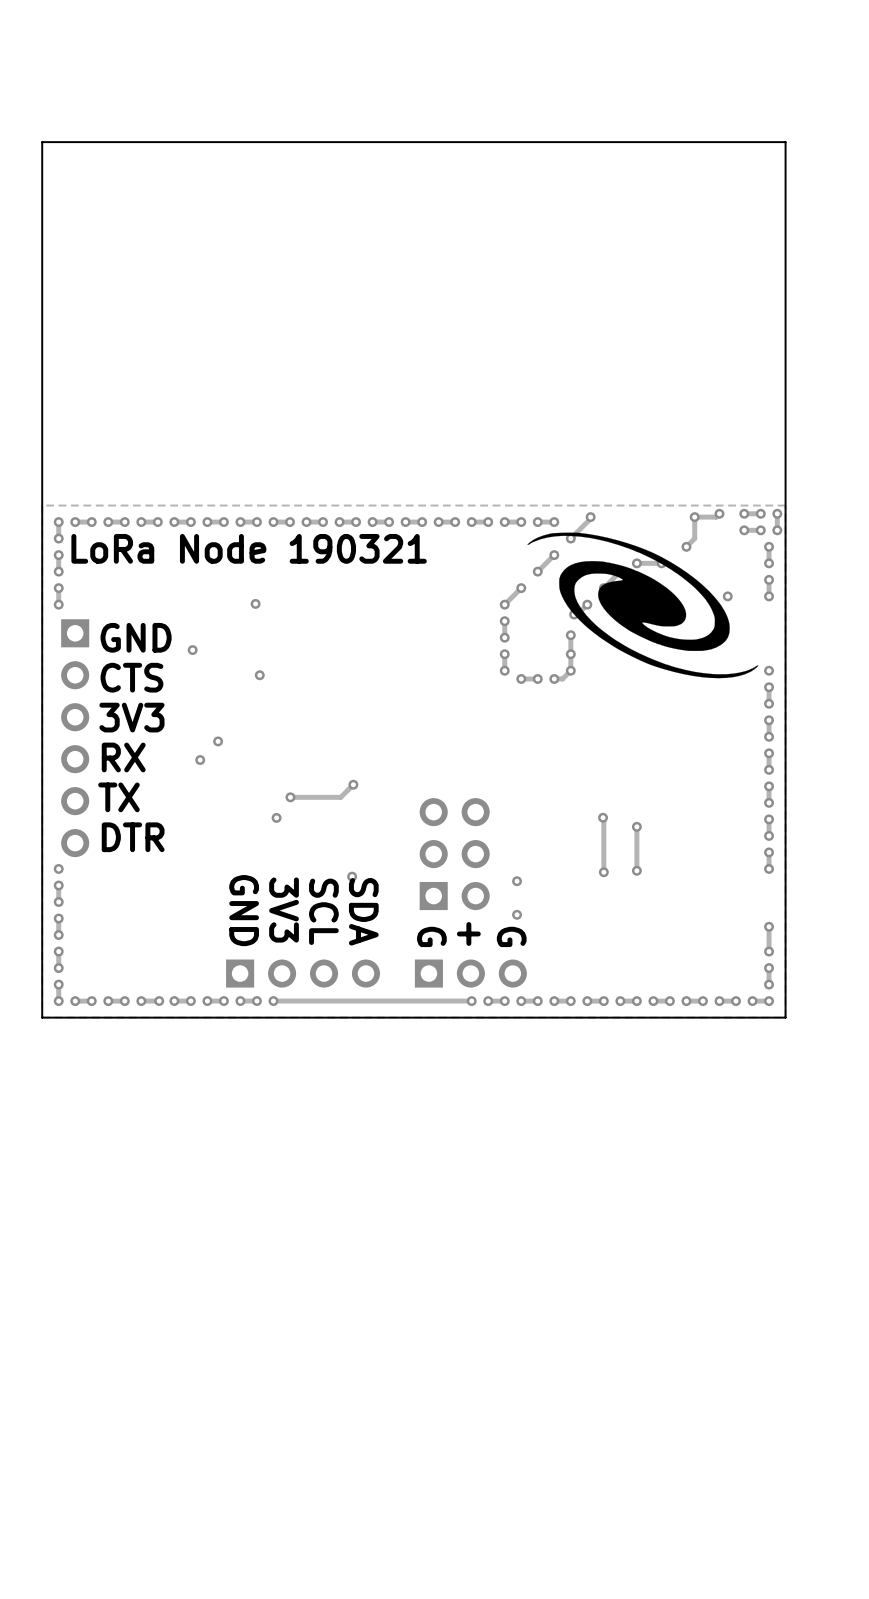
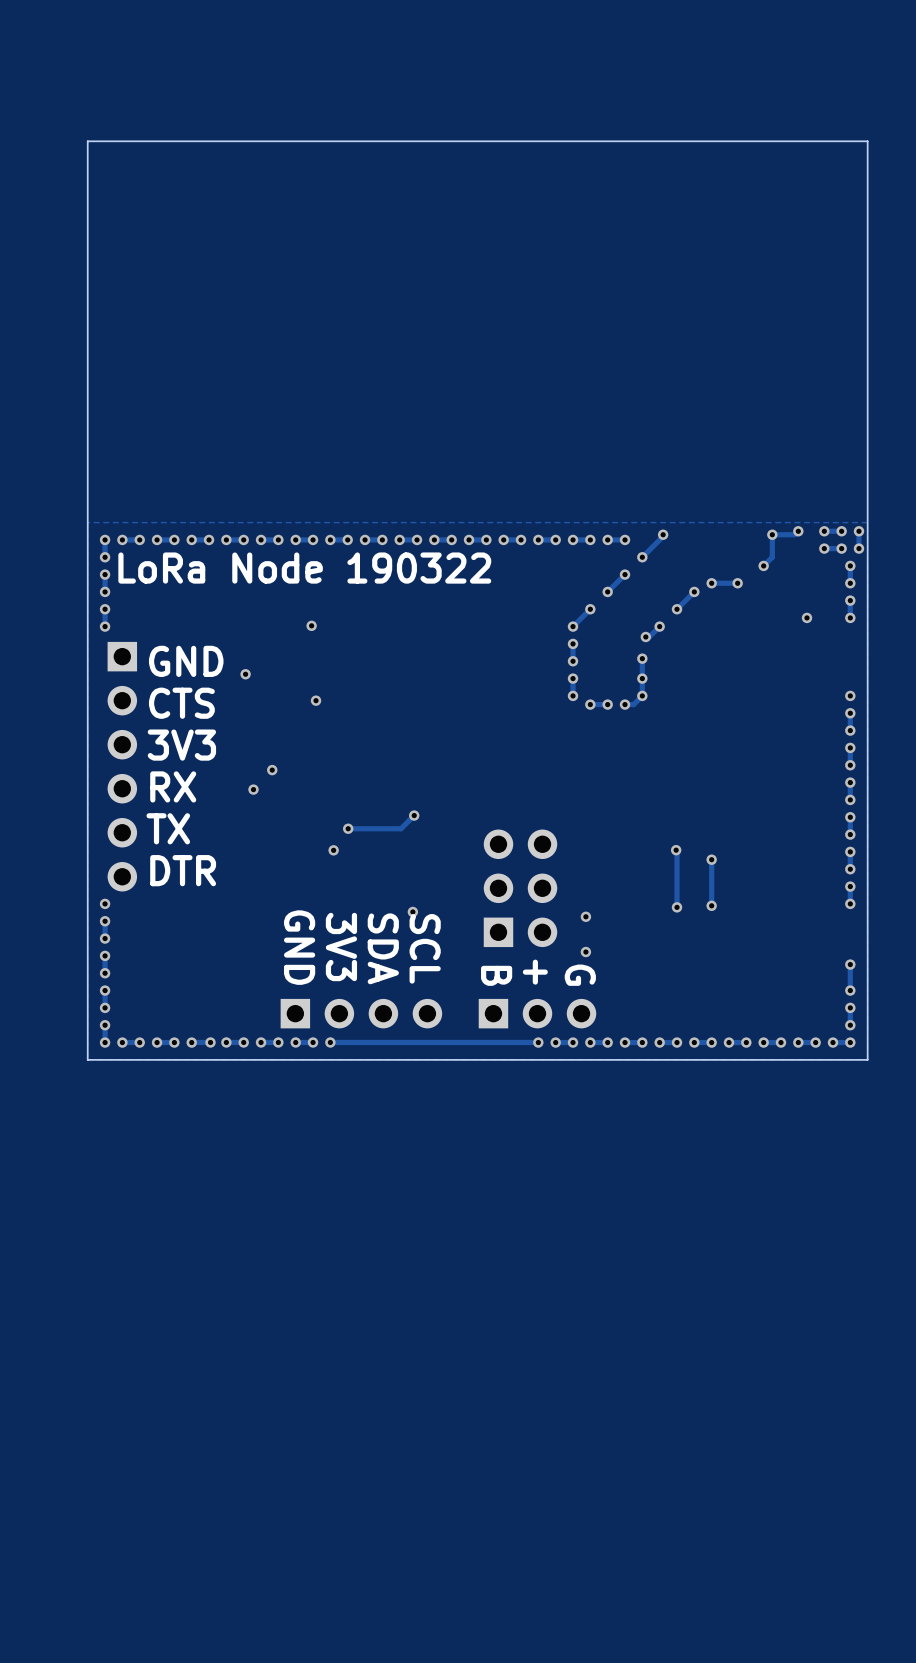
drawing: [527, 532, 759, 679] -> none
text: LoRa Node 190321 (249, 548) -> LoRa Node 190322 (304, 568)
text: SCL (323, 911) -> SDA (383, 948)
text: SDA (363, 911) -> SCL (425, 948)
text: G (431, 936) -> B (496, 975)

